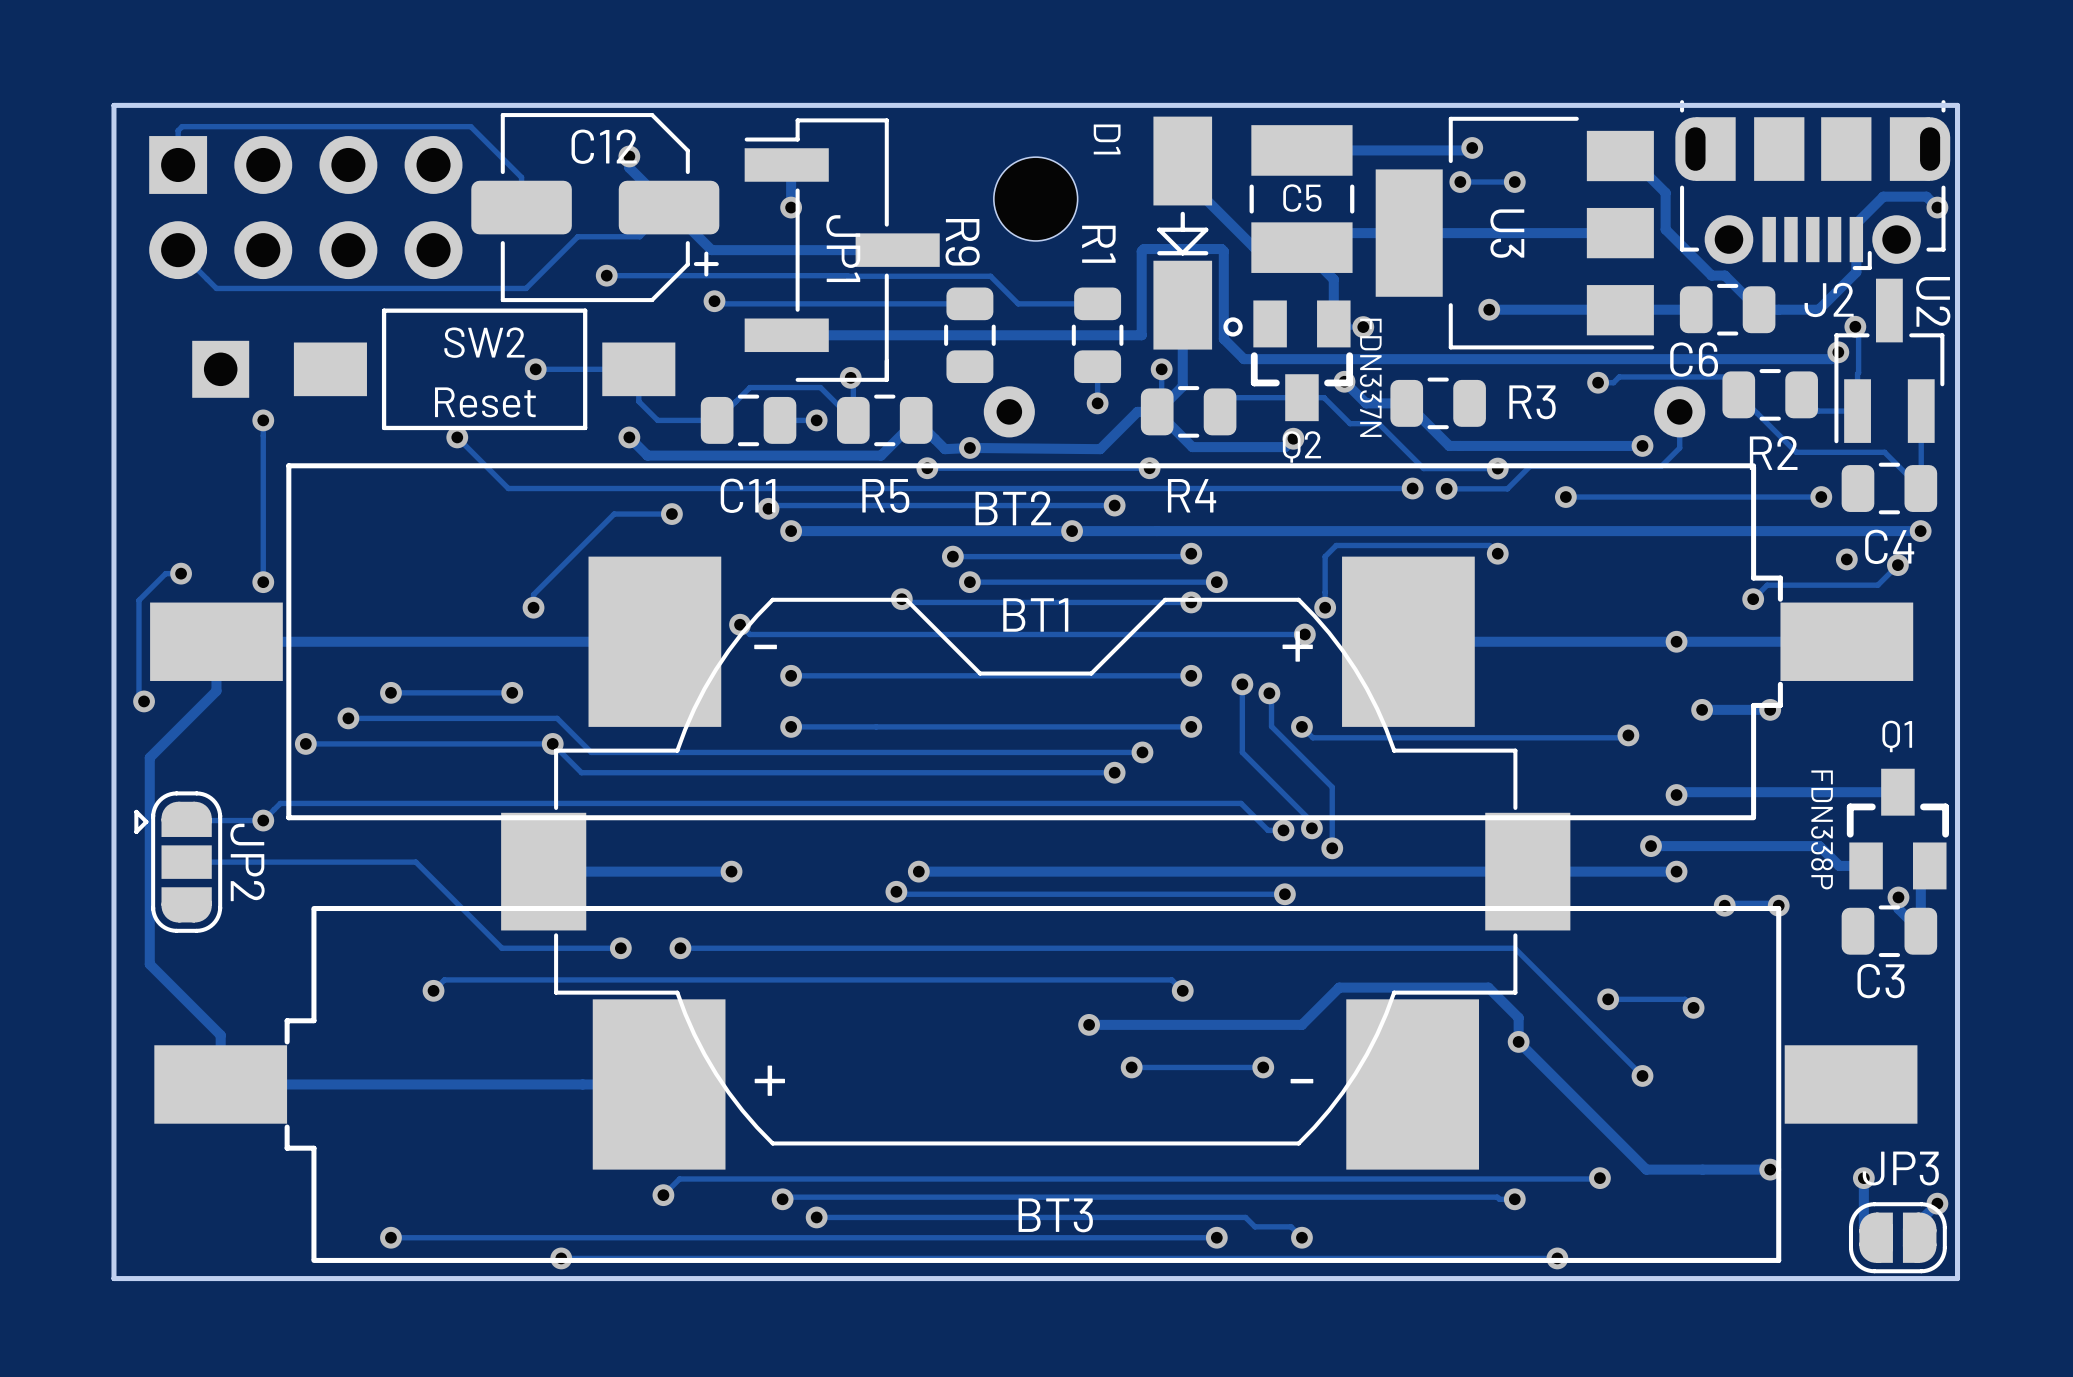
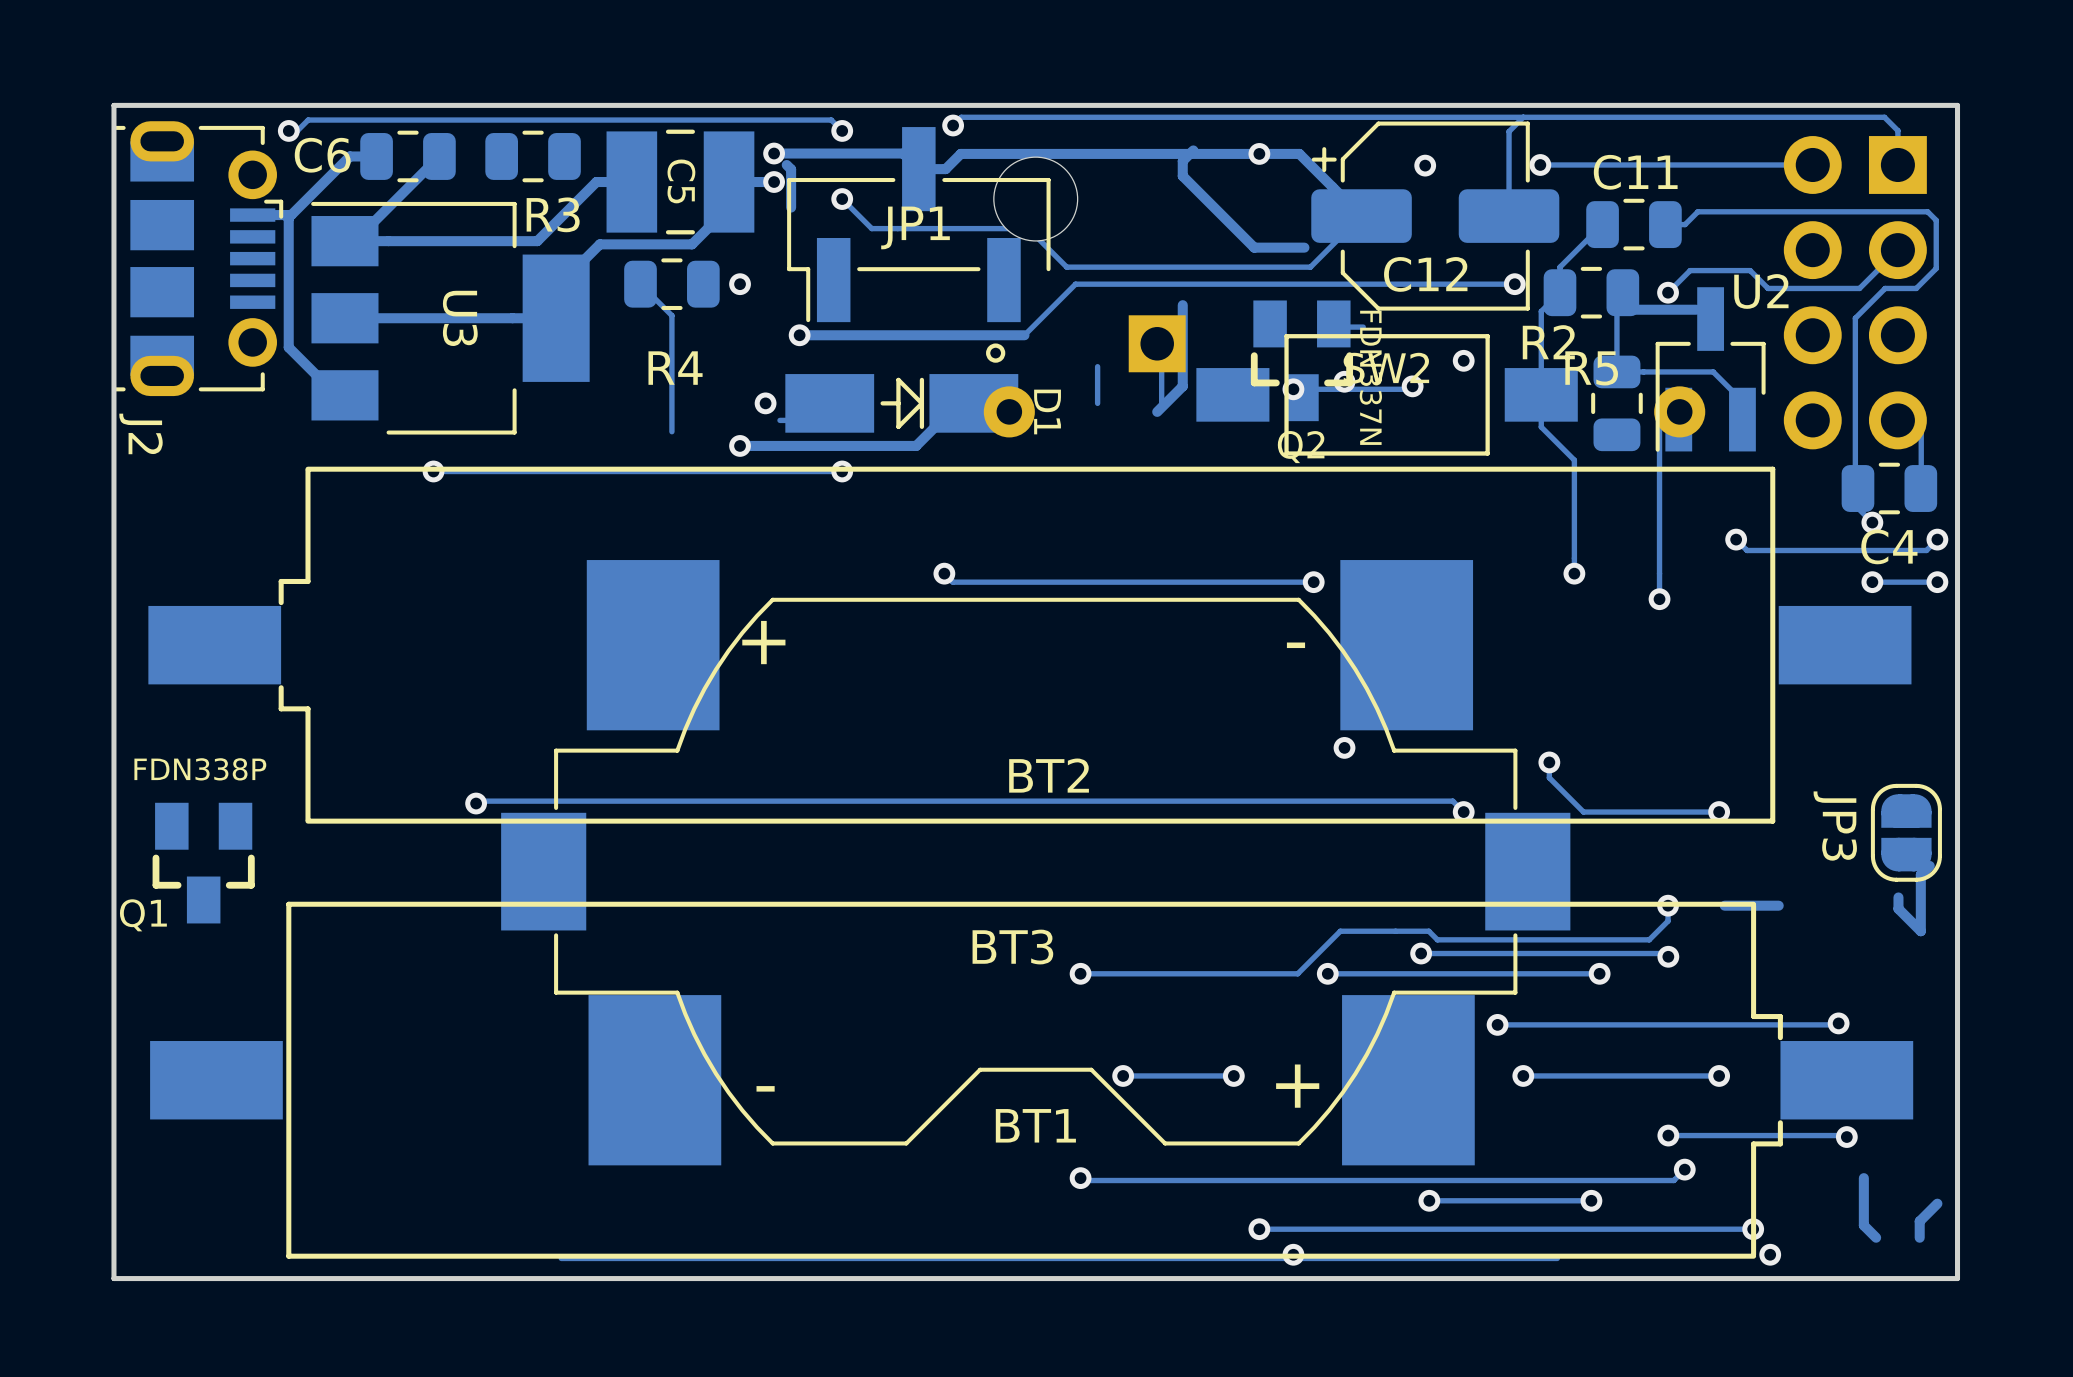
track: none -> (1523, 117) (1509, 131) (1509, 216)
track: none -> (953, 125) (961, 117) (1884, 117) (1897, 130) (1897, 164)
via: none -> (953, 125)
via: none -> (288, 130)
track: none -> (842, 130) (831, 120) (308, 120) (297, 130) (288, 130)
via: none -> (842, 130)
D1 name position: D1 (1107, 139) -> D1 (1047, 411)
track: (1472, 147) (1469, 150) (1301, 150) -> none
via: (1472, 147) -> none
track: none -> (774, 153) (903, 153) (918, 169) (945, 169) (960, 153) (1299, 153) (1361, 216) (1310, 267) (1066, 267) (1028, 228) (871, 228) (842, 199)
via: none -> (774, 153)
via: none -> (1259, 153)
track: none -> (376, 156) (349, 156) (291, 215) (252, 215)
track: none -> (439, 156) (354, 241)
track: (629, 156) (629, 167) (711, 250) (897, 250) -> none
via: (629, 156) -> none
track: (1620, 156) (1628, 156) (1665, 192) (1665, 229) (1711, 275) (1724, 275) (1759, 309) (1818, 309) (1856, 272) (1856, 223) (1883, 196) (1926, 196) (1937, 207) -> none
track: (178, 164) (178, 130) (182, 126) (470, 126) (521, 177) (521, 207) -> none
track: none -> (1812, 164) (1540, 164)
via: none -> (1425, 165)
track: none -> (631, 182) (596, 182) (537, 241) (344, 241)
track: none -> (774, 182) (729, 182) (729, 207) (692, 244) (599, 244) (556, 288) (556, 318) (344, 318)
via: none -> (774, 182)
via: (1460, 182) -> none
track: (1514, 182) (1460, 182) -> none
via position: (1514, 182) -> (1540, 164)
J2 rotation: 0° (1812, 185) -> 90° counterclockwise (198, 258)
J2 position: (1812, 185) -> (198, 258)
via: none -> (842, 199)
C5 rotation: 0° (1301, 199) -> 90° clockwise (680, 182)
C5 position: (1301, 199) -> (680, 182)
part: (305, 207) -> none
C12 rotation: 0° (595, 207) -> 180° (1435, 216)
C12 position: (595, 207) -> (1435, 216)
track: (669, 207) (639, 236) (577, 236) (526, 288) (216, 288) (178, 250) -> none
via: (791, 207) -> none
via: (1937, 207) -> none
track: none -> (285, 215) (288, 218) (288, 347) (336, 395) (344, 395)
track: none -> (1602, 224) (1559, 267) (1559, 292) (1541, 311) (1541, 427) (1574, 460) (1574, 573)
track: none -> (1665, 224) (1685, 224) (1697, 211) (1927, 211) (1936, 220) (1936, 268) (1916, 288) (1885, 288) (1855, 318) (1855, 505) (1872, 522)
D1 rotation: 0° (1198, 233) -> 90° counterclockwise (901, 388)
D1 position: (1198, 233) -> (901, 388)
U3 rotation: 0° (1514, 233) -> 180° (450, 318)
U3 position: (1514, 233) -> (450, 318)
track: (1620, 233) (1316, 233) (1301, 247) (1333, 279) (1333, 323) -> none
JP1 rotation: 0° (842, 250) -> 90° counterclockwise (918, 224)
track: none -> (1897, 250) (1859, 288) (1768, 288) (1750, 270) (1690, 270) (1668, 292)
track: (606, 275) (990, 276) (1018, 303) (1097, 303) -> none
via: (606, 275) -> none
track: none -> (640, 284) (671, 315) (671, 431)
via: none -> (1514, 284)
track: none -> (1622, 292) (1616, 298) (1616, 371) (1713, 371) (1742, 401) (1742, 419)
via: none -> (1668, 292)
part: none -> (1855, 292)
J2 name position: J2 (1829, 299) -> J2 (141, 433)
track: (714, 301) (717, 303) (969, 303) -> none
via position: (714, 301) -> (740, 284)
U2 name rotation: 0° (1933, 301) -> 90° counterclockwise (1761, 291)
via: (1489, 309) -> none
track: (1619, 309) (1489, 309) -> none
C6 position: (1727, 309) -> (408, 156)
track: (1855, 326) (1858, 330) (1857, 411) (1817, 411) (1801, 394) -> none
via: (1855, 326) -> none
via: (1363, 327) -> none
via: none -> (799, 335)
R9: (969, 335) -> none
track: (1024, 335) (1141, 335) (1141, 251) (1144, 249) (1221, 249) (1223, 251) (1223, 338) (1243, 359) (1831, 359) (1838, 352) -> (1024, 335) (1075, 284) (1514, 284)
R1: (1097, 335) -> none
part: none -> (1157, 343)
via: (1838, 352) -> none
C6 name position: C6 (1694, 359) -> C6 (322, 155)
via: none -> (1463, 360)
U2 position: (1889, 360) -> (1710, 369)
part: (220, 369) -> none
SW2 position: (484, 369) -> (1387, 394)
track: (535, 369) (638, 369) (638, 401) (657, 420) (717, 420) (749, 387) (820, 387) (853, 420) (853, 380) (850, 377) -> none
via: (535, 369) -> none
via: (1161, 369) -> none
via: (850, 377) -> none
track: (1344, 381) (1366, 403) (1406, 403) (1449, 445) (1642, 445) -> none
track: (1598, 382) (1613, 382) (1619, 376) (1735, 376) (1738, 380) (1738, 394) (1796, 452) (1884, 452) (1920, 488) -> none
via: (1598, 382) -> none
track: none -> (1412, 386) (1409, 389) (1293, 389)
via: none -> (1412, 386)
via: none -> (1293, 389)
R2 rotation: 0° (1770, 394) -> 90° clockwise (1616, 403)
R2 position: (1770, 394) -> (1616, 403)
SW2 value: Reset (485, 402) -> none
R3 name position: R3 (1532, 402) -> R3 (553, 214)
via: none -> (765, 403)
track: none -> (973, 403) (958, 403) (916, 445) (740, 445)
via: (1097, 403) -> none
R3 position: (1438, 403) -> (533, 156)
R4 position: (1188, 411) -> (671, 284)
track: (1220, 411) (1234, 397) (1324, 397) (1350, 423) (1378, 423) (1423, 468) (1497, 468) -> none
track: (1679, 411) (1679, 448) (1661, 466) (1530, 466) (1507, 488) (1446, 488) -> none
track: (263, 420) (263, 582) -> none
via: (263, 420) -> none
C11 position: (748, 420) -> (1633, 224)
via: (816, 420) -> none
R5 position: (884, 420) -> (1591, 292)
track: none -> (1659, 420) (1659, 599)
track: (457, 437) (508, 488) (1412, 488) -> none
via position: (457, 437) -> (433, 471)
track: (629, 437) (647, 455) (881, 455) (916, 420) (944, 449) (1100, 449) (1137, 411) (1157, 411) (1192, 447) (1285, 447) (1293, 438) -> none
via: (629, 437) -> none
via: (1293, 438) -> none
via: none -> (740, 445)
via: (1642, 445) -> none
via: (969, 447) -> none
via: (927, 468) -> none
track: (1149, 468) (927, 468) -> none
via: (1149, 468) -> none
via: (1497, 468) -> none
track: none -> (842, 471) (433, 471)
via: none -> (842, 471)
via: (1412, 488) -> none
via: (1446, 488) -> none
C11 name position: C11 (748, 495) -> C11 (1635, 172)
via: (1565, 497) -> none
track: (1821, 497) (1565, 497) -> none
via: (1821, 497) -> none
track: (1114, 505) (771, 505) (768, 508) -> none
via: (1114, 505) -> none
via: (768, 508) -> none
track: (671, 514) (614, 514) (533, 594) (533, 607) -> none
via: (671, 514) -> none
via: none -> (1872, 522)
via: (791, 531) -> none
via: (1072, 531) -> none
track: (1920, 531) (791, 531) -> none
via position: (1920, 531) -> (1937, 539)
via: none -> (1736, 539)
track: none -> (1937, 539) (1926, 550) (1747, 550) (1736, 539)
track: (1191, 553) (1188, 556) (952, 556) -> none
via: (1191, 553) -> none
track: (1497, 553) (1489, 545) (1336, 545) (1325, 556) (1325, 607) -> none
via: (1497, 553) -> none
via position: (952, 556) -> (944, 573)
via: (1846, 559) -> none
track: (1897, 565) (1877, 585) (1767, 585) (1753, 599) -> none
via: (1897, 565) -> none
track: (181, 573) (165, 573) (138, 600) (138, 696) (144, 701) -> none
via: (181, 573) -> none
track: none -> (944, 573) (952, 582) (969, 582)
via: none -> (1574, 573)
via: (263, 582) -> none
via: (969, 582) -> none
via: (1216, 582) -> none
track: none -> (1313, 582) (1216, 582)
via: none -> (1313, 582)
via: none -> (1872, 582)
track: none -> (1937, 582) (1872, 582)
via: none -> (1937, 582)
track: (901, 599) (905, 602) (1191, 602) -> none
via: (901, 599) -> none
via: (1753, 599) -> none
via: (1191, 602) -> none
via: (533, 607) -> none
via: (1325, 607) -> none
track: (740, 624) (749, 634) (1304, 634) -> none
via: (740, 624) -> none
via: (1304, 634) -> none
track: (654, 641) (216, 641) (216, 691) (149, 757) (149, 964) (220, 1035) (220, 1084) (659, 1084) -> none
BT2 rotation: 0° (1031, 641) -> 180° (1029, 645)
via position: (1676, 641) -> (1659, 599)
track: (1846, 641) (1408, 641) -> none
via: (791, 675) -> none
track: (1191, 675) (791, 675) -> none
via: (1191, 675) -> none
track: (1242, 684) (1242, 752) (1311, 822) (1311, 828) -> none
via: (1242, 684) -> none
via: (390, 692) -> none
track: (512, 692) (390, 692) -> none
via: (512, 692) -> none
track: (1269, 693) (1271, 691) (1271, 726) (1332, 787) (1332, 848) -> none
via: (1269, 693) -> none
via: (144, 701) -> none
via: (1702, 709) -> none
track: (1770, 709) (1702, 709) -> none
via: (1770, 709) -> none
track: (348, 718) (557, 718) (591, 752) (1142, 752) -> none
via: (348, 718) -> none
via: (791, 726) -> none
track: (1191, 726) (791, 726) -> none
via: (1191, 726) -> none
track: (1301, 726) (1312, 737) (1626, 737) (1628, 735) -> none
via: (1301, 726) -> none
via: (1628, 735) -> none
Q1 name position: Q1 (1897, 736) -> Q1 (143, 915)
track: (305, 743) (552, 743) (581, 772) (1114, 772) -> none
via: (305, 743) -> none
via: (552, 743) -> none
via: none -> (1344, 747)
via: (1142, 752) -> none
track: none -> (1549, 762) (1549, 777) (1583, 812) (1719, 812)
via: none -> (1549, 762)
via: (1114, 772) -> none
track: (1897, 792) (1679, 792) (1676, 795) -> none
via: (1676, 795) -> none
track: none -> (476, 803) (478, 801) (1452, 801) (1463, 812)
via: none -> (476, 803)
via: none -> (1463, 812)
via: none -> (1719, 812)
track: (186, 818) (188, 820) (263, 820) (280, 803) (1241, 803) (1268, 830) (1283, 830) -> none
via: (263, 820) -> none
via: (1311, 828) -> none
Q1 value position: FDN338P (1822, 829) -> FDN338P (200, 769)
Q1 rotation: 0° (1897, 829) -> 180° (203, 863)
Q1 position: (1897, 829) -> (203, 863)
via: (1283, 830) -> none
track: (1651, 846) (1819, 846) (1839, 865) (1866, 865) -> none
via: (1651, 846) -> none
via: (1332, 848) -> none
JP2: (178, 862) -> none
track: (186, 862) (415, 862) (502, 948) (620, 948) -> none
track: (731, 871) (543, 871) -> none
via: (731, 871) -> none
via: (918, 871) -> none
BT1 rotation: 0° (1035, 871) -> 180° (1035, 871)
track: (1676, 871) (918, 871) -> none
via: (1676, 871) -> none
track: (896, 891) (898, 894) (1284, 894) -> none
via: (896, 891) -> none
via: (1284, 894) -> none
via: (1898, 897) -> none
track: none -> (1668, 905) (1668, 921) (1649, 939) (1437, 939) (1428, 931) (1340, 931) (1297, 973) (1080, 973)
via: none -> (1668, 905)
via: (1724, 905) -> none
via: (1778, 905) -> none
C3: (1889, 931) -> none
via: (620, 948) -> none
track: (680, 948) (1514, 948) (1642, 1075) -> none
via: (680, 948) -> none
track: none -> (1421, 953) (1665, 953) (1668, 956)
via: none -> (1421, 953)
via: none -> (1668, 956)
via: none -> (1080, 973)
via: none -> (1327, 973)
track: none -> (1599, 973) (1327, 973)
via: (433, 990) -> none
track: (1182, 990) (1171, 979) (444, 979) (433, 990) -> none
via: (1182, 990) -> none
track: (1608, 999) (1685, 999) (1693, 1007) -> none
via position: (1608, 999) -> (1599, 973)
via: (1693, 1007) -> none
track: none -> (1838, 1023) (1497, 1024)
via: none -> (1838, 1023)
track: (1089, 1024) (1301, 1024) (1339, 987) (1488, 987) (1518, 1017) (1518, 1041) (1646, 1169) (1770, 1169) -> none
via: (1089, 1024) -> none
via position: (1518, 1041) -> (1497, 1024)
via position: (1131, 1067) -> (1123, 1075)
track: (1263, 1067) (1131, 1067) -> none
via position: (1263, 1067) -> (1233, 1075)
track: none -> (1233, 1075) (1123, 1075)
via: none -> (1523, 1075)
via: (1642, 1075) -> none
track: none -> (1719, 1075) (1523, 1075)
via: none -> (1719, 1075)
BT3 rotation: 0° (1035, 1084) -> 180° (1031, 1080)
track: none -> (1668, 1135) (1846, 1137)
via: none -> (1668, 1135)
via: none -> (1846, 1137)
JP3 name position: JP3 (1900, 1168) -> JP3 (1835, 826)
track: none -> (1684, 1169) (1673, 1180) (1082, 1180) (1080, 1178)
via: none -> (1684, 1169)
via: (1770, 1169) -> none
via: none -> (1080, 1178)
track: (1599, 1178) (679, 1179) (663, 1195) -> none
via position: (1599, 1178) -> (1591, 1200)
via: (1863, 1178) -> none
via: (663, 1195) -> none
via: (782, 1199) -> none
track: (1514, 1199) (1499, 1199) (1497, 1197) (784, 1197) (782, 1199) -> none
via: (1514, 1199) -> none
via: none -> (1429, 1200)
track: none -> (1591, 1200) (1429, 1200)
via: (1937, 1203) -> none
track: (816, 1217) (1245, 1217) (1254, 1226) (1291, 1226) (1301, 1237) -> none
via: (816, 1217) -> none
via: none -> (1259, 1229)
track: none -> (1753, 1229) (1259, 1229)
via: none -> (1753, 1229)
via: (390, 1237) -> none
track: (1216, 1237) (390, 1237) -> none
via: (1216, 1237) -> none
via position: (1301, 1237) -> (1293, 1254)
JP3 rotation: 0° (1897, 1237) -> 90° clockwise (1906, 832)
JP3 position: (1897, 1237) -> (1906, 832)
via: none -> (1770, 1254)
via: (561, 1258) -> none
via: (1557, 1258) -> none

